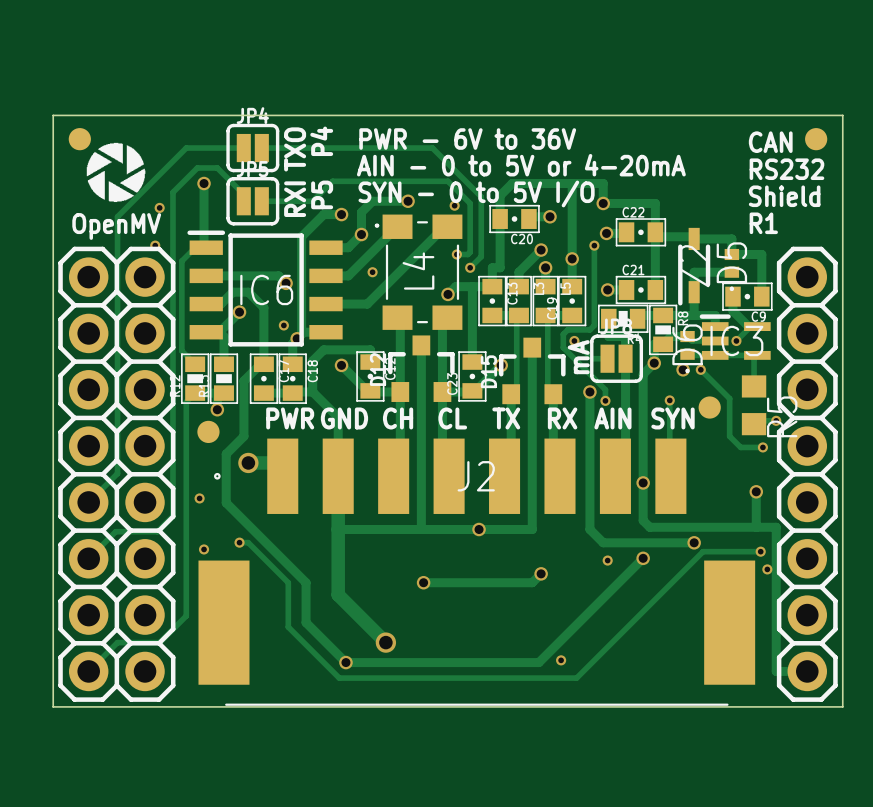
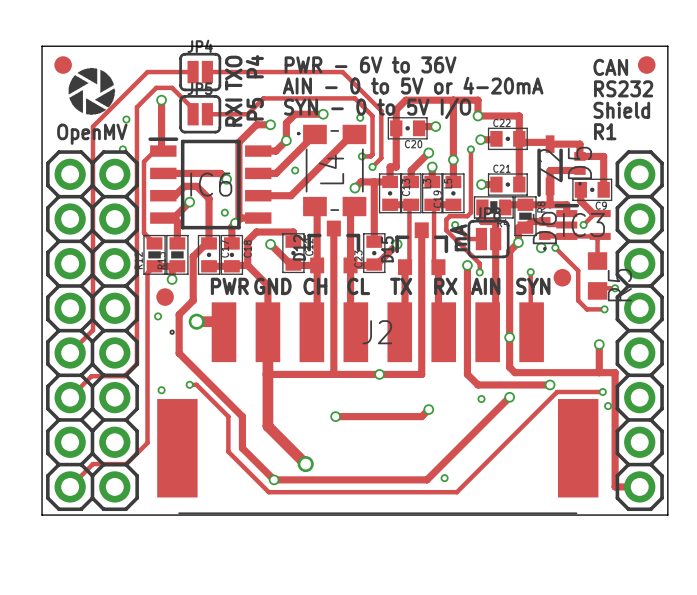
via position: (199, 498) -> (158, 316)

